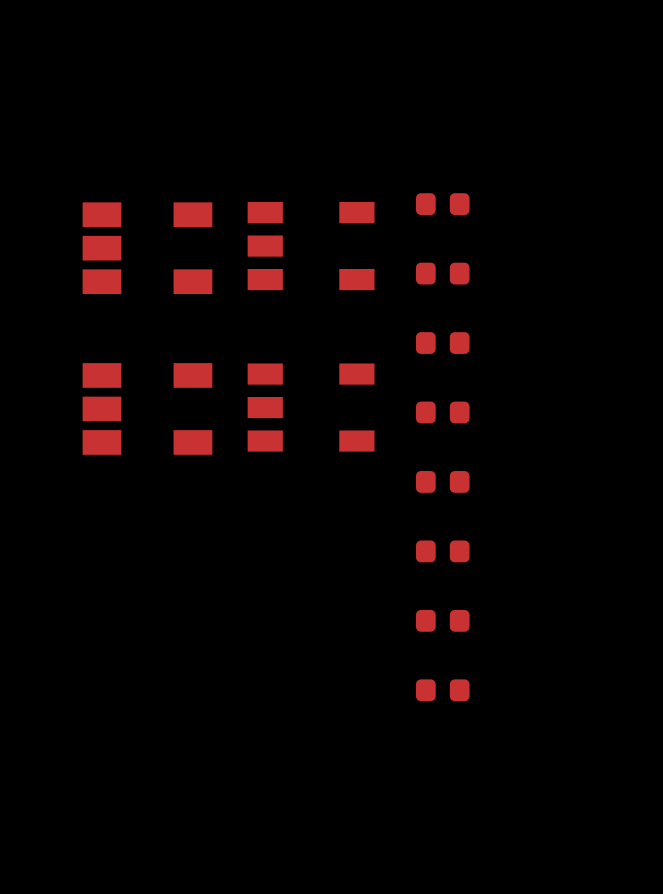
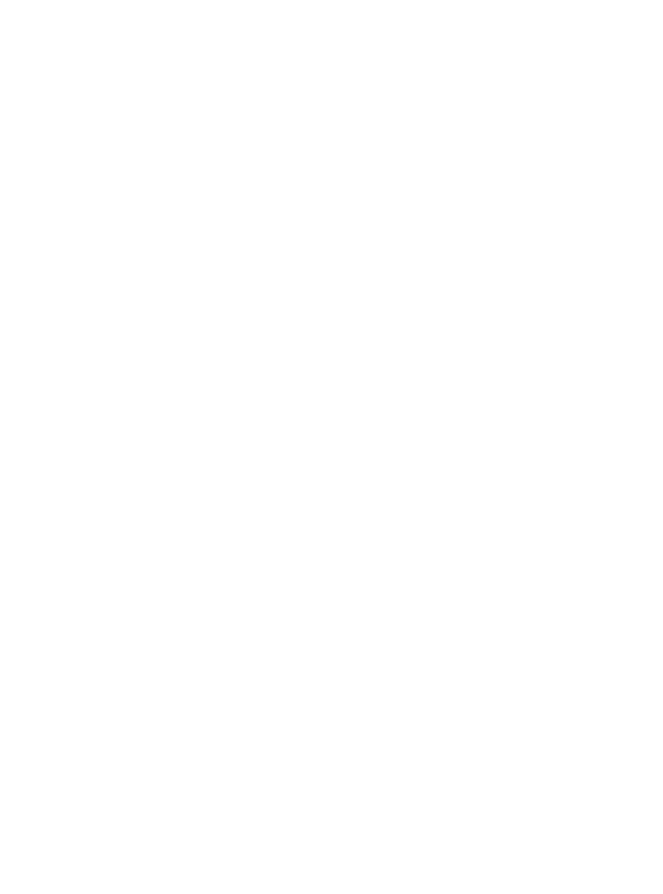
part: (442, 204) -> none
part: (311, 246) -> none
part: (147, 248) -> none
part: (442, 273) -> none
part: (442, 343) -> none
part: (311, 407) -> none
part: (147, 408) -> none
part: (442, 412) -> none
part: (442, 481) -> none
part: (442, 551) -> none
part: (442, 620) -> none
part: (442, 690) -> none

